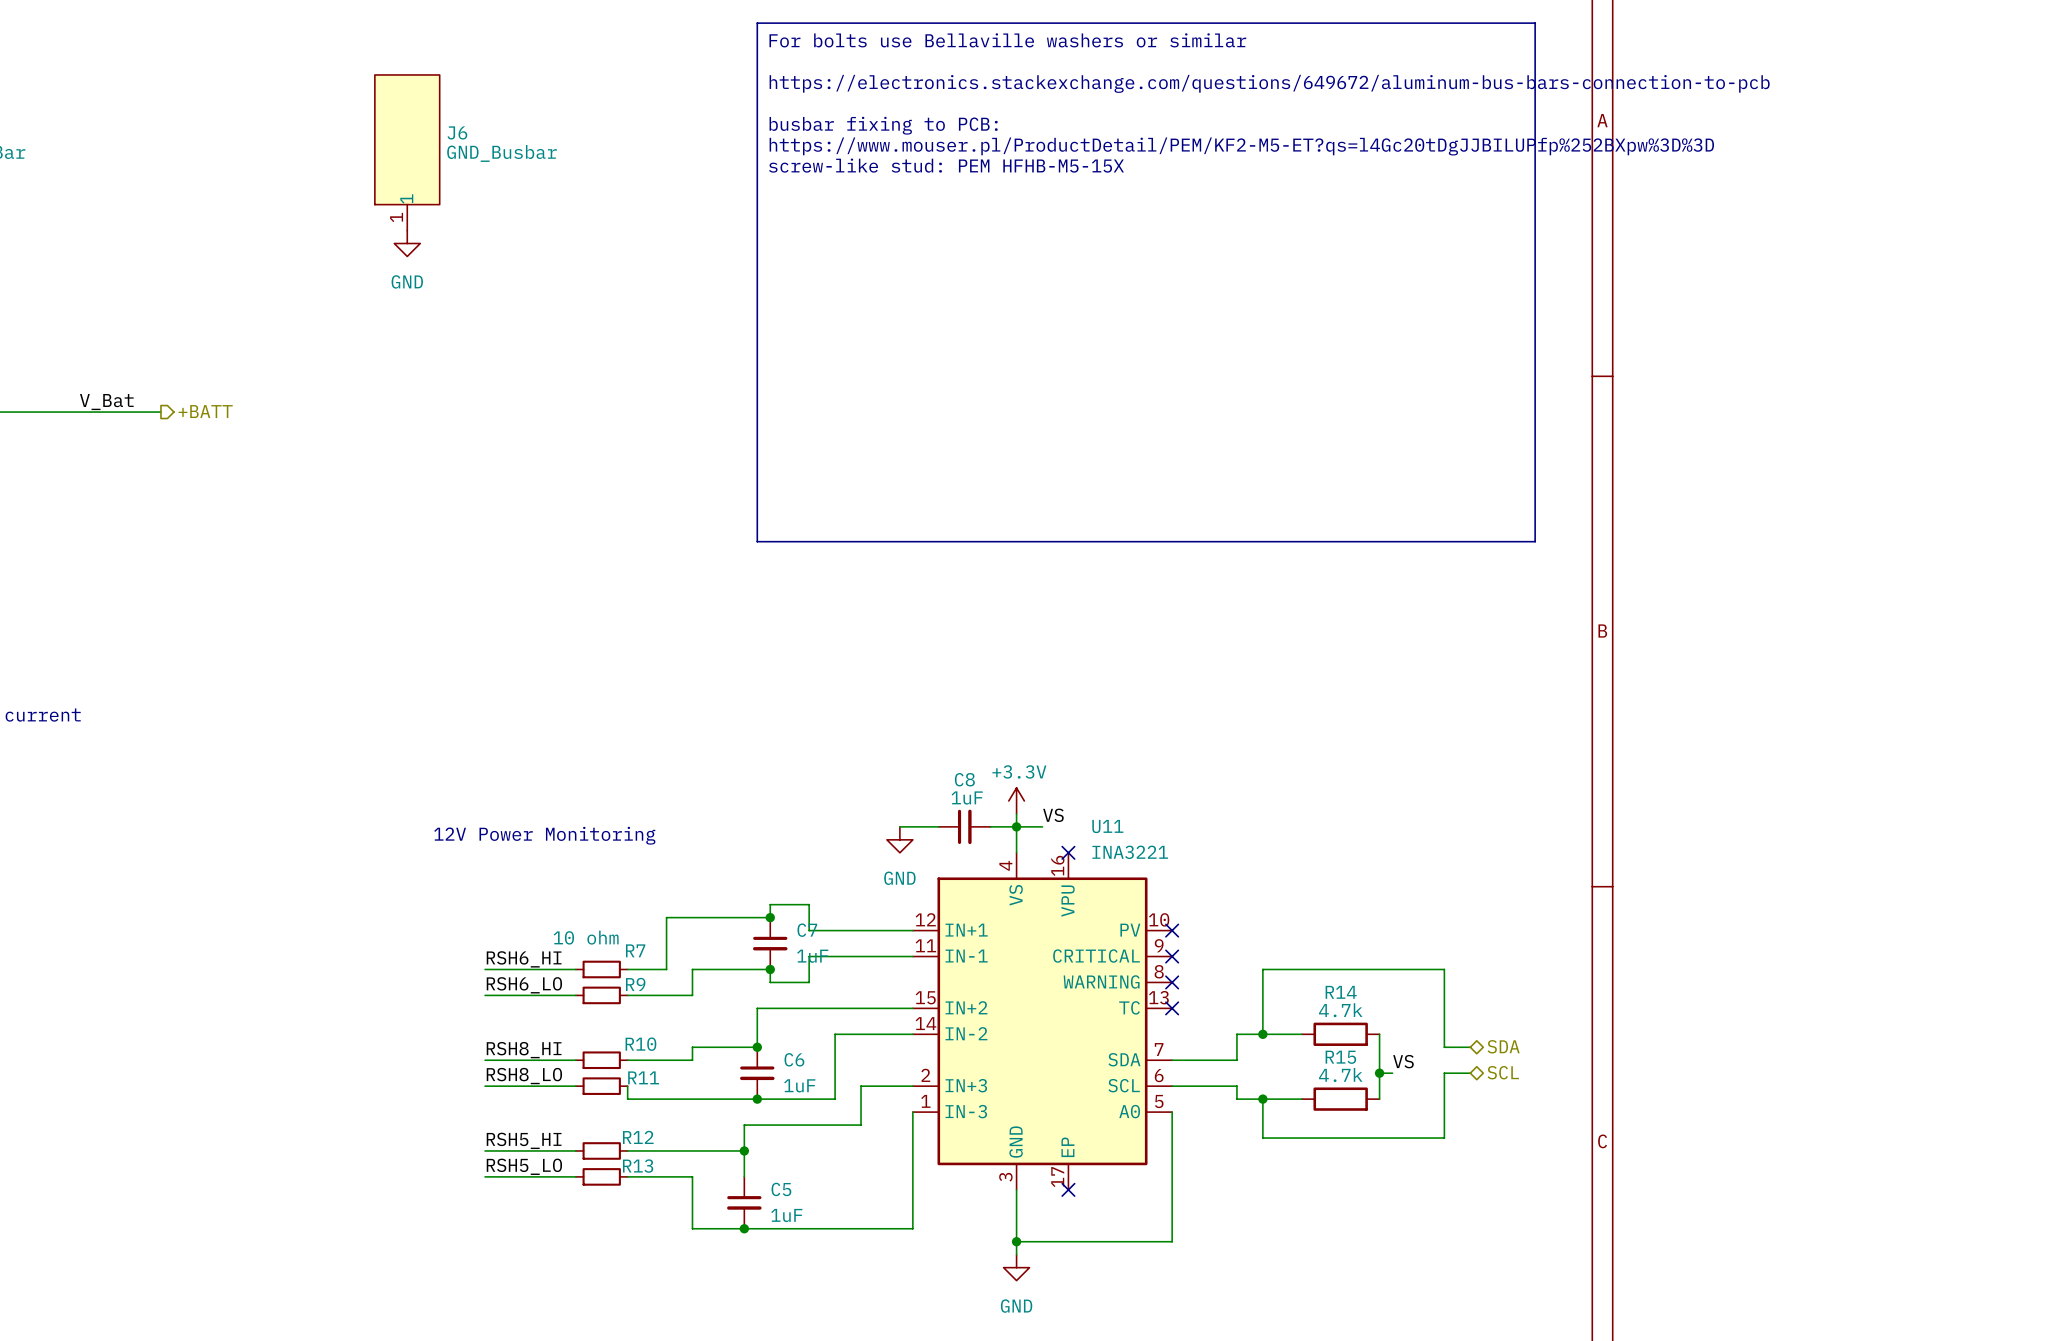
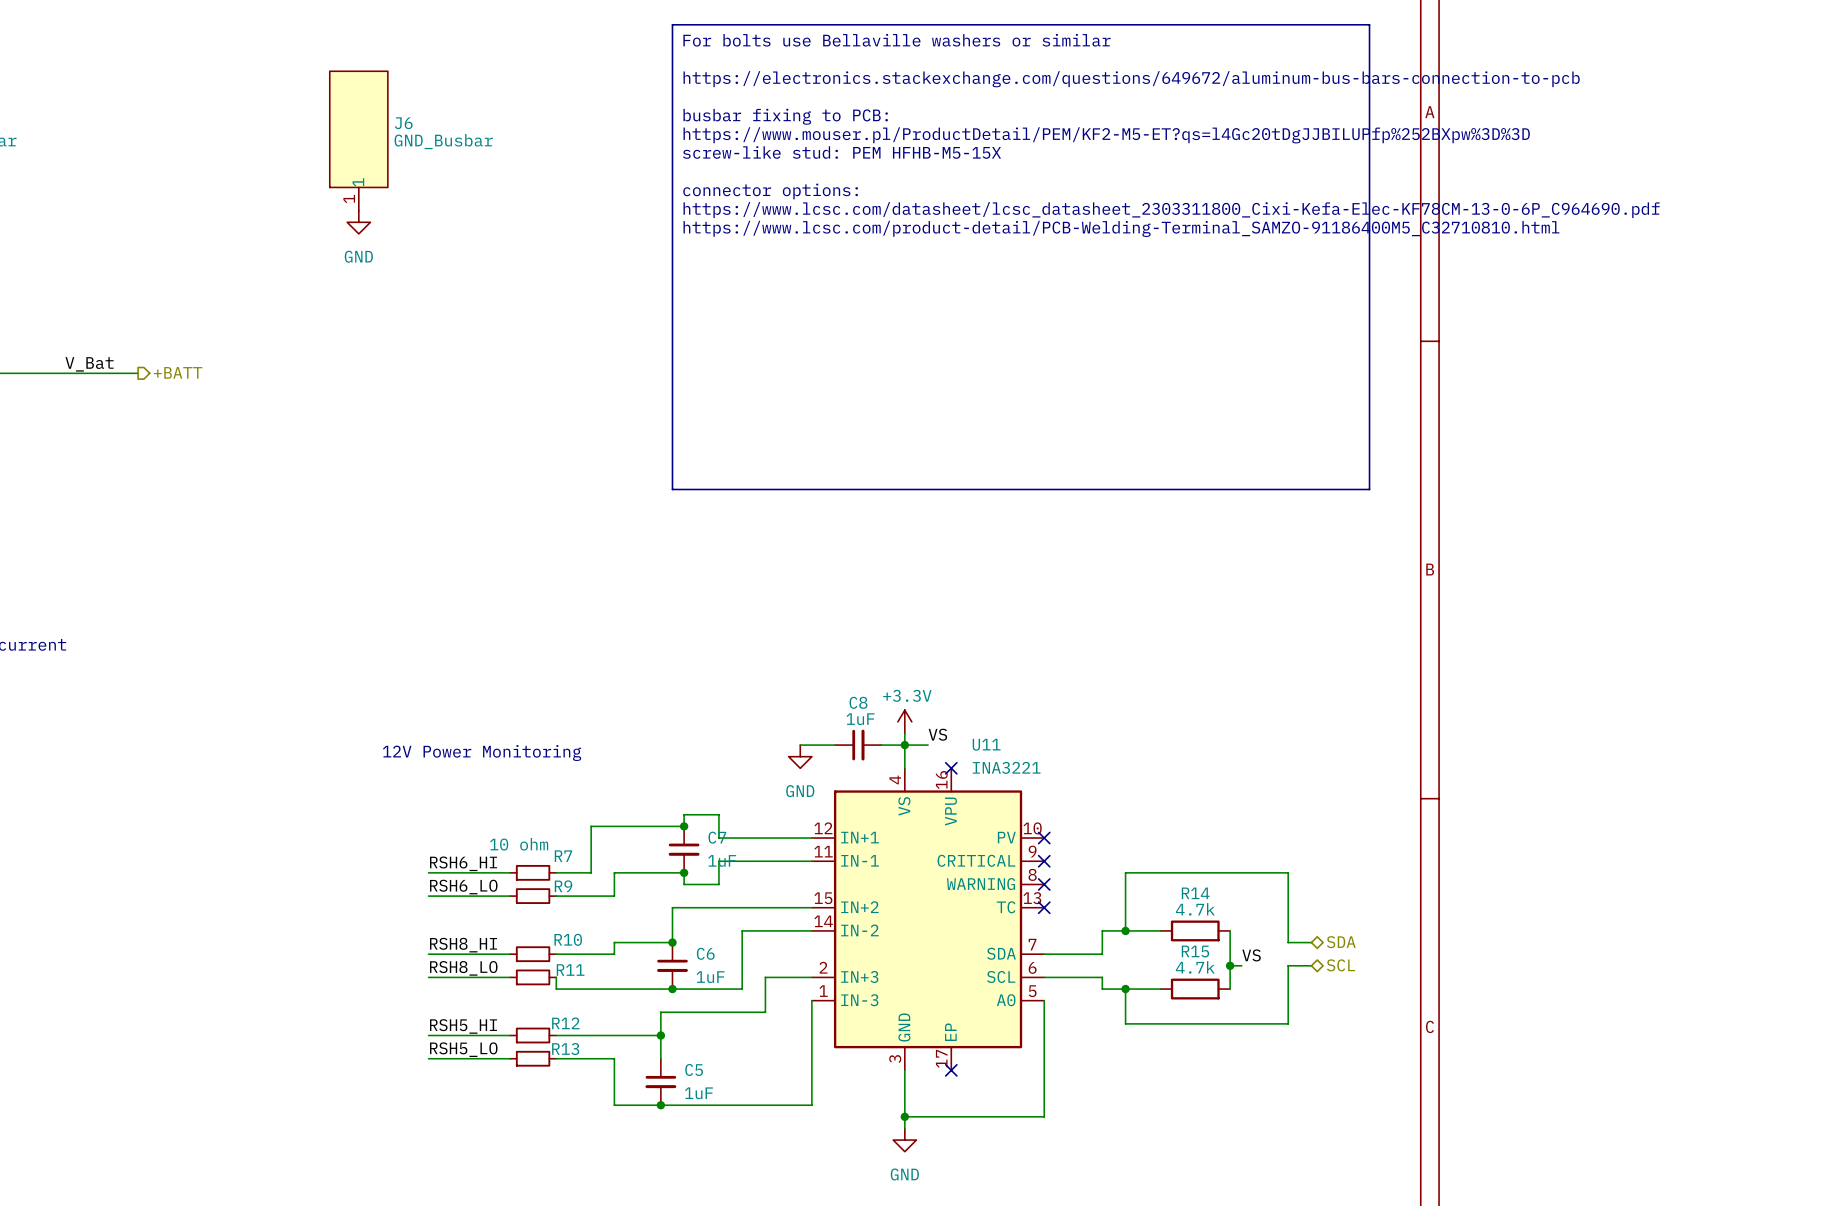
text: none -> connector options: (770, 191)
text: none -> https://www.lcsc.com/datasheet/lcsc_datasheet_2303311800_Cixi-Kefa-Elec-KF78CM-13-0-6P_C964690.pdf (1171, 210)
text: none -> https://www.lcsc.com/product-detail/PCB-Welding-Terminal_SAMZO-91186400M5_C32710810.html (1121, 228)

